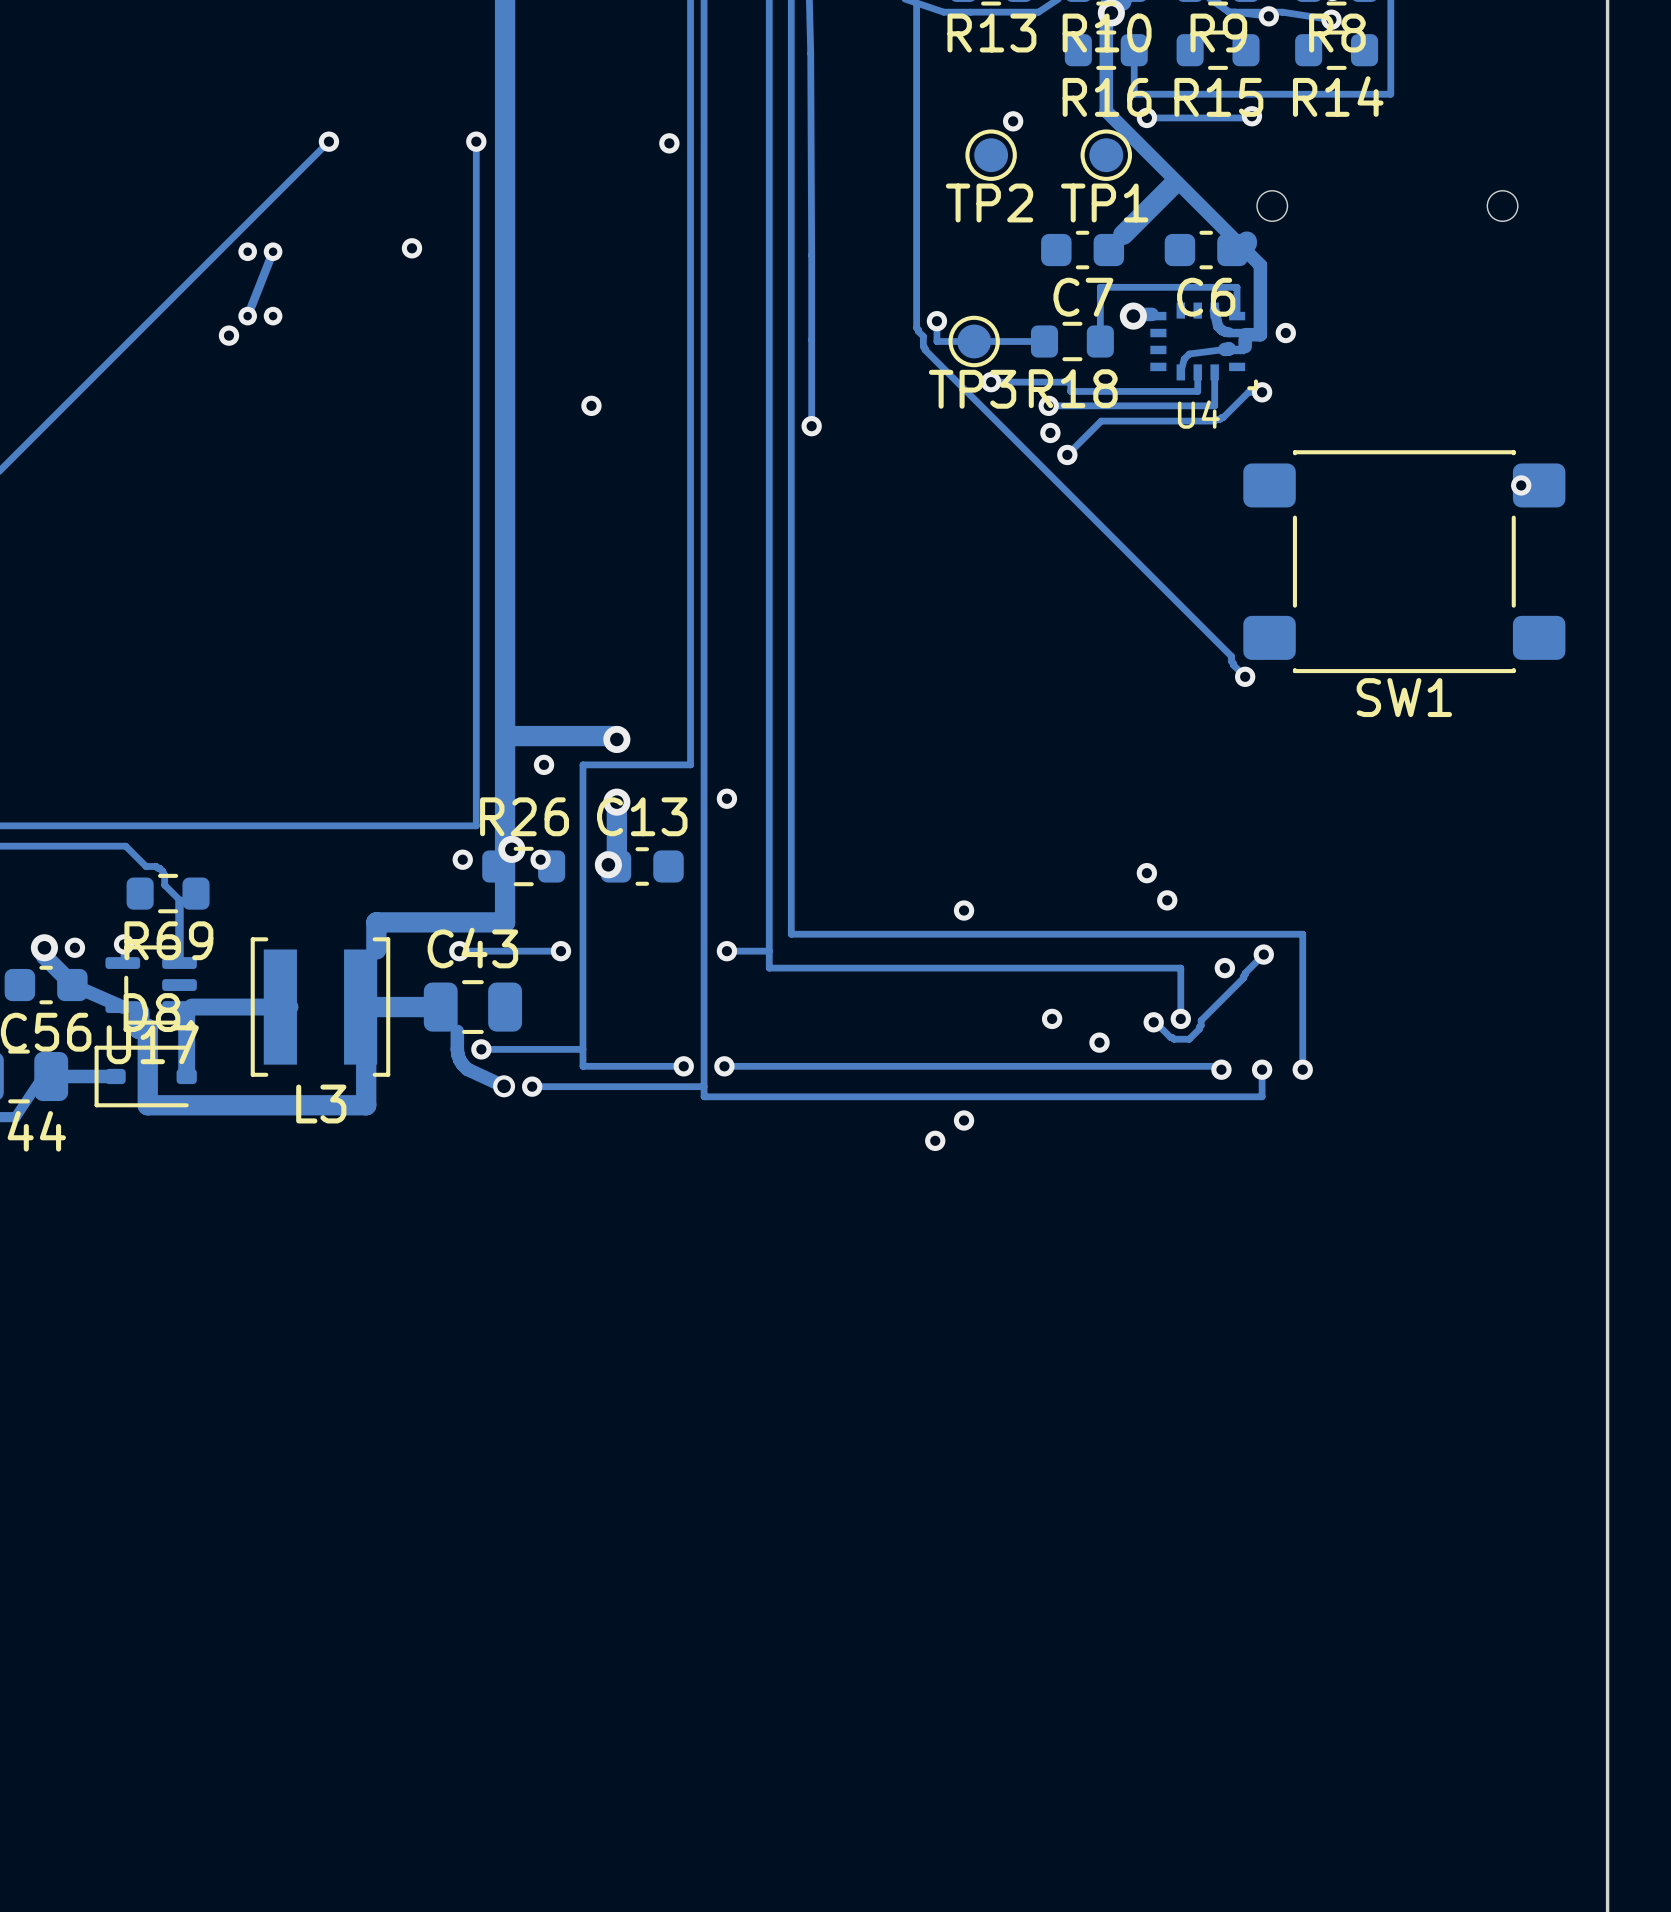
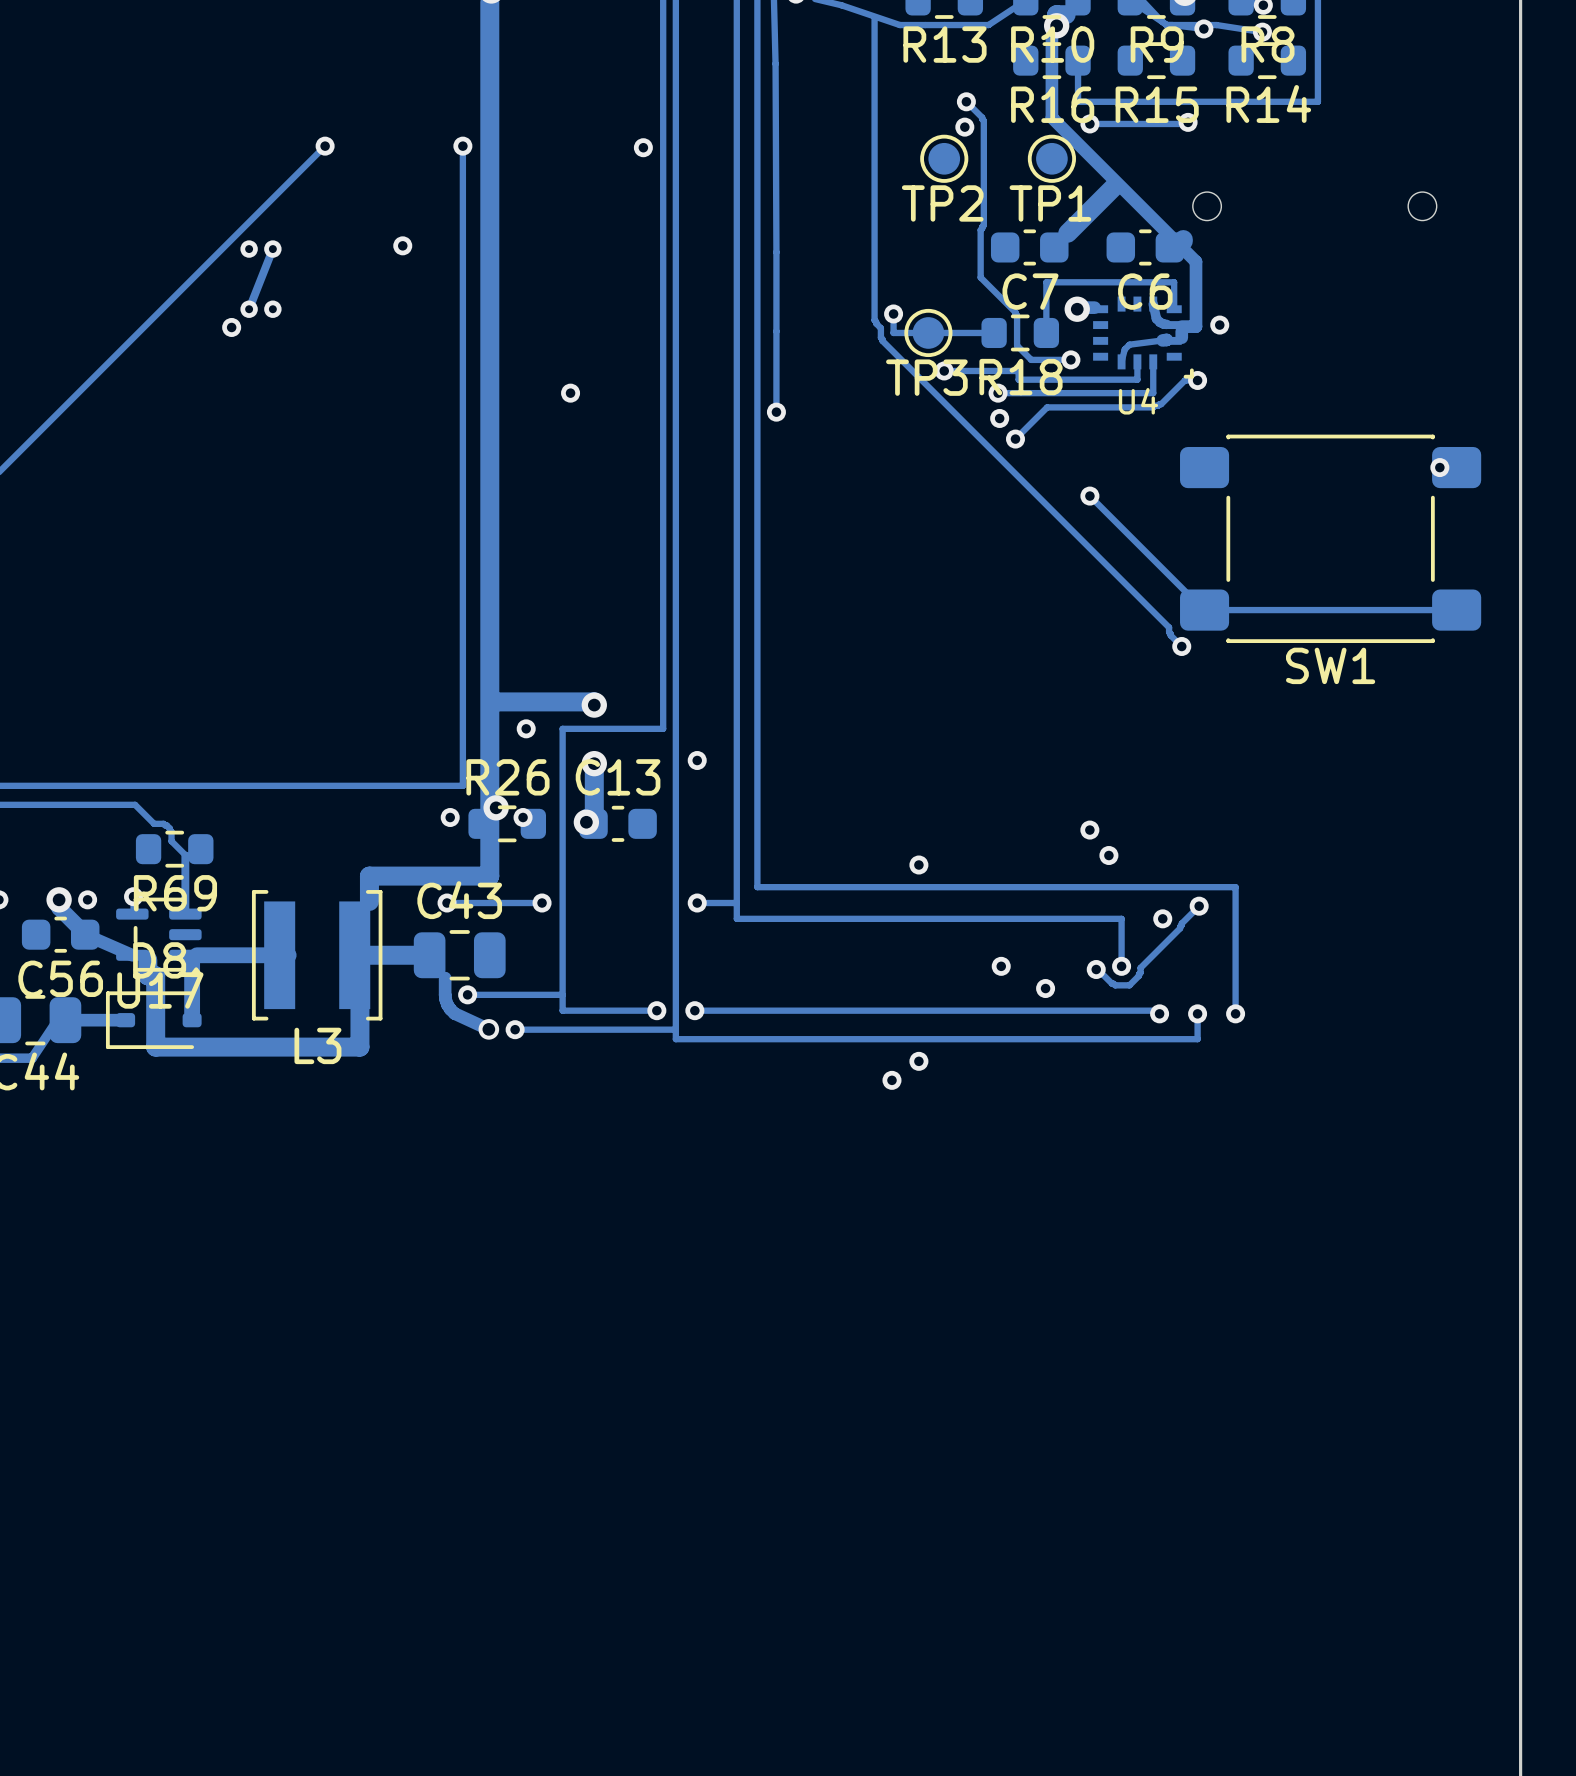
track: none -> (966, 101) (983, 120) (983, 225) (980, 230) (980, 277) (1015, 312) (1017, 345) (1031, 359) (1070, 359)
via: none -> (966, 101)
via: none -> (1070, 359)
track: none -> (1089, 496) (1203, 610) (1457, 610)
via: none -> (1089, 496)

